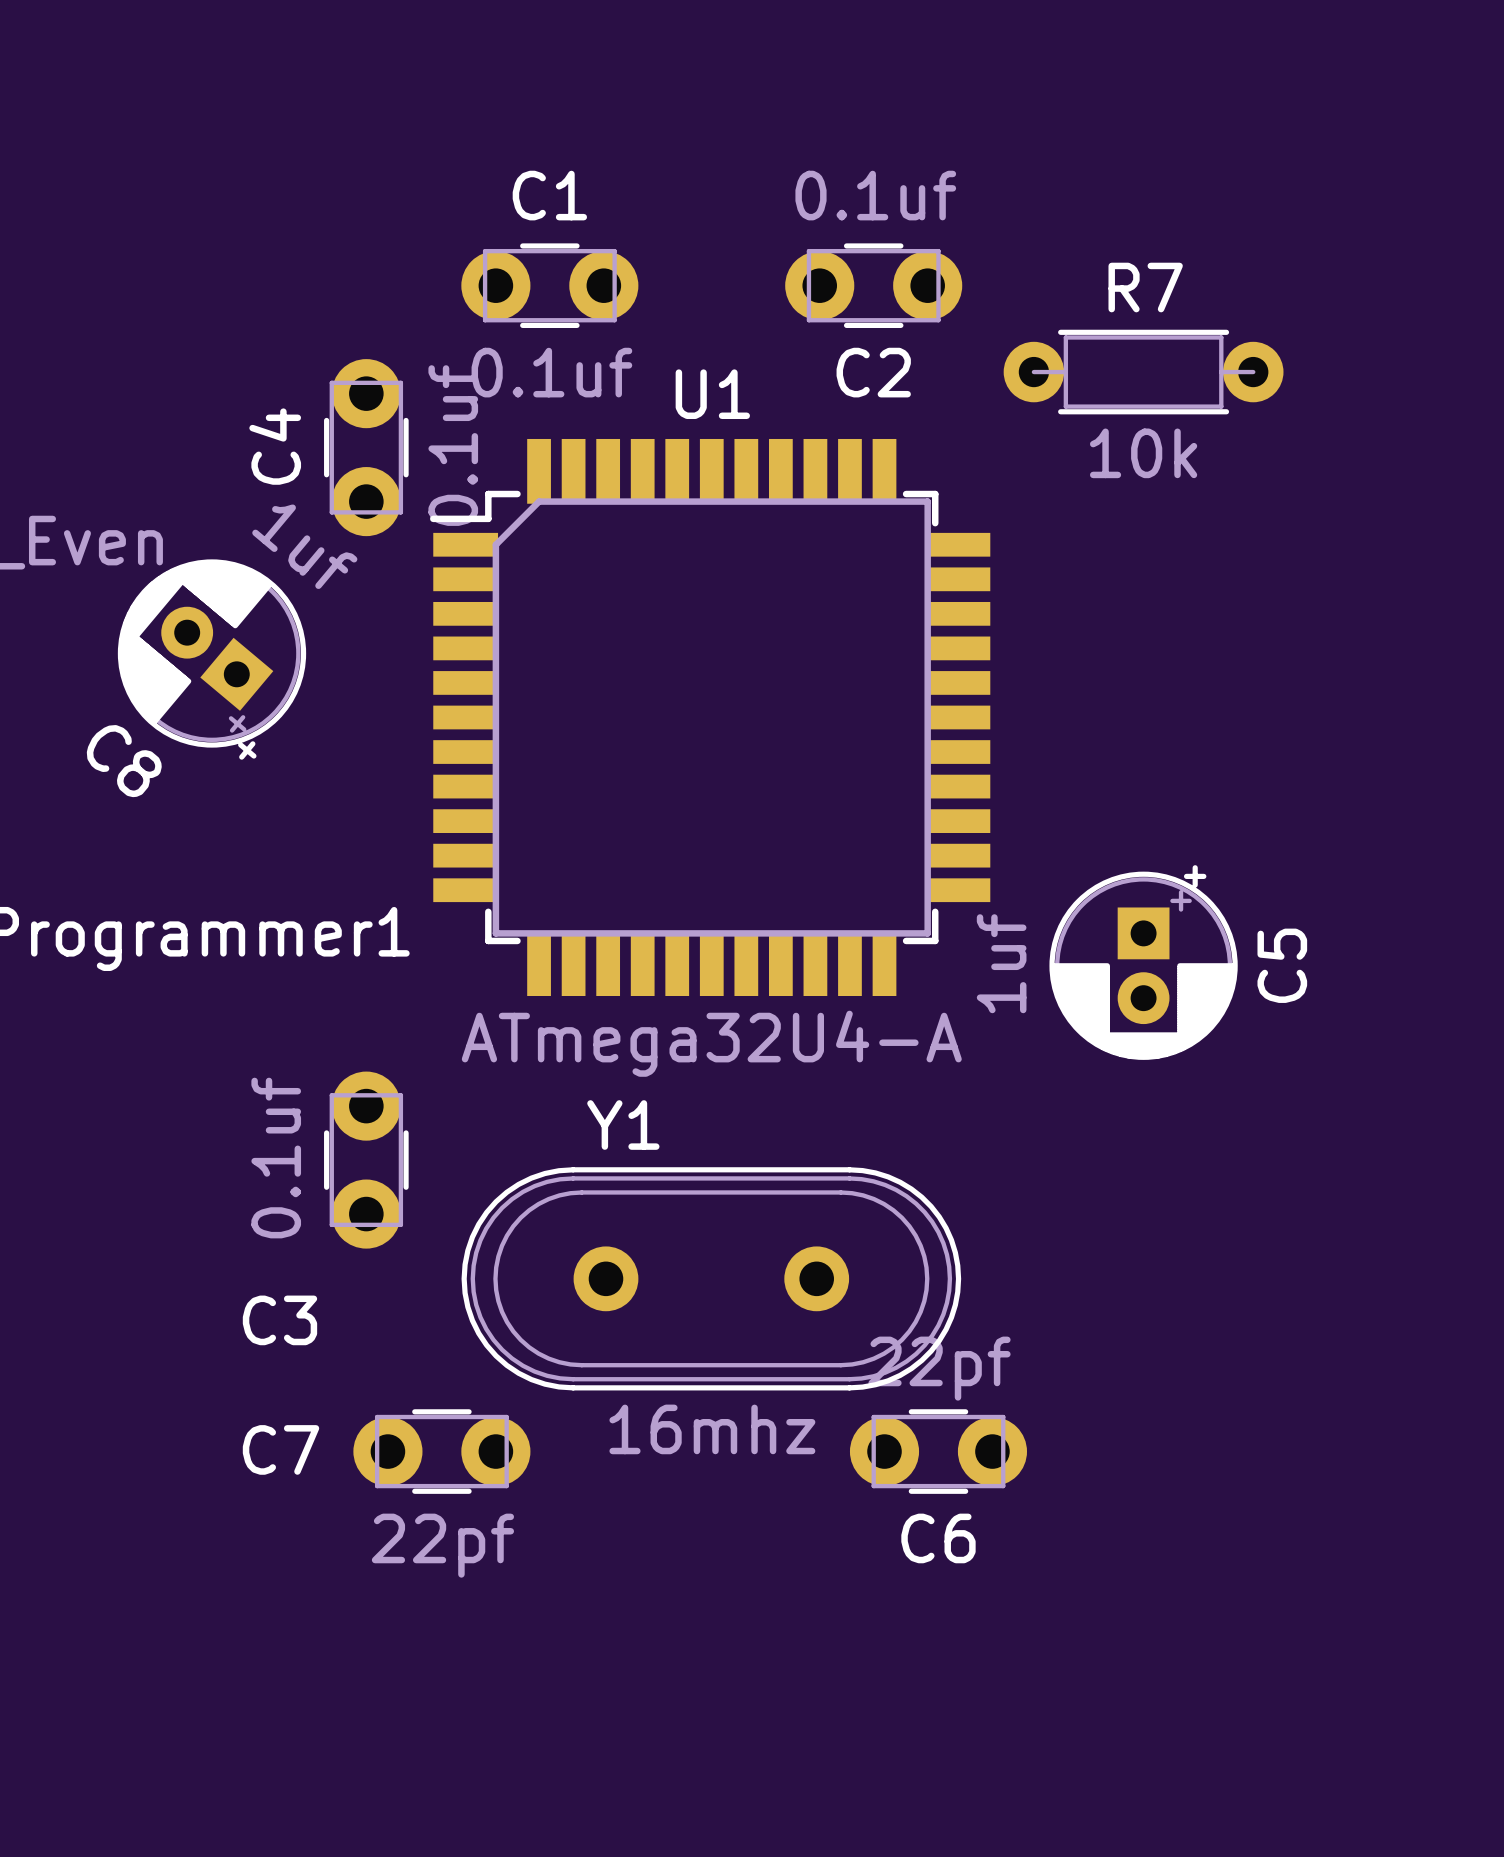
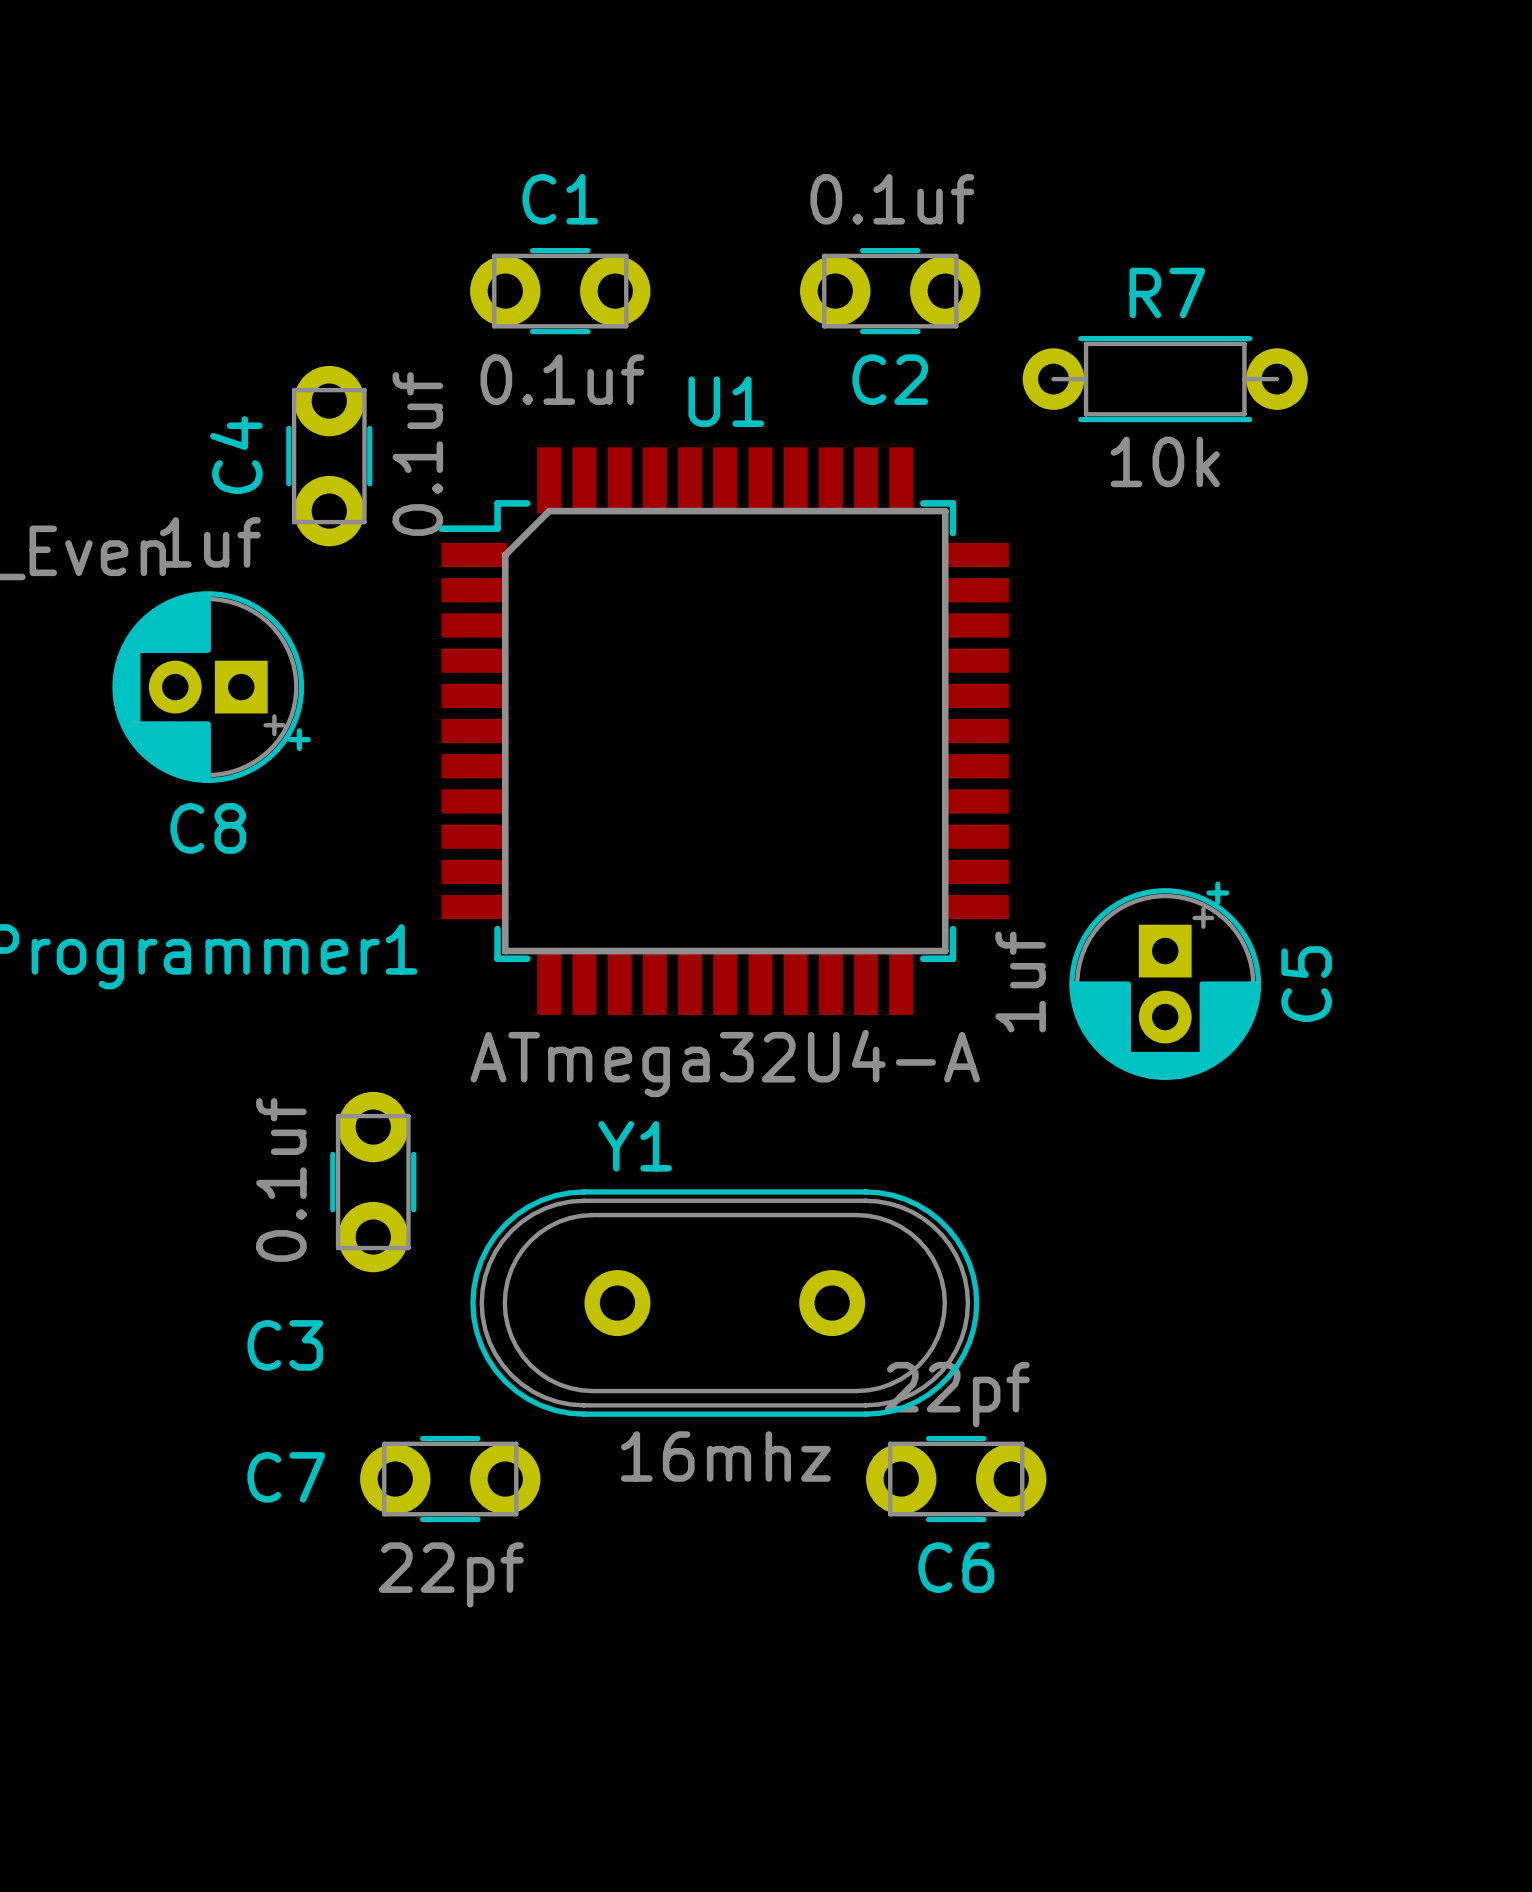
C4 position: (366, 447) -> (329, 456)
C8 rotation: 0° (211, 659) -> 40° counterclockwise (211, 687)

